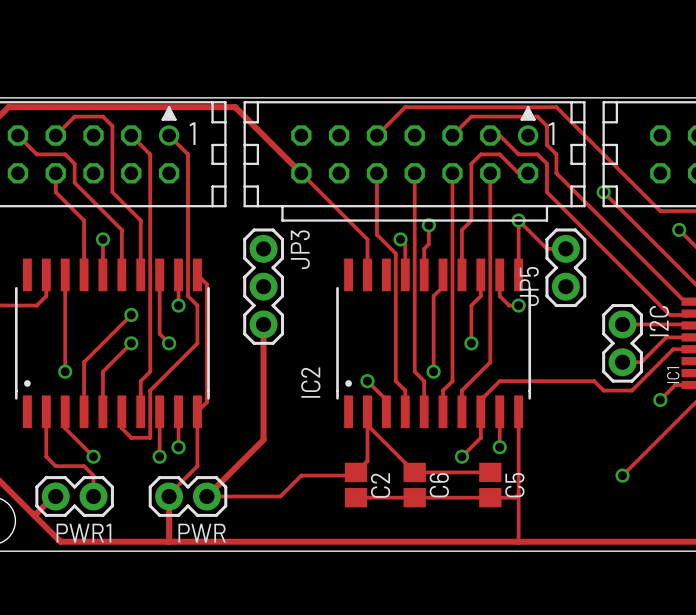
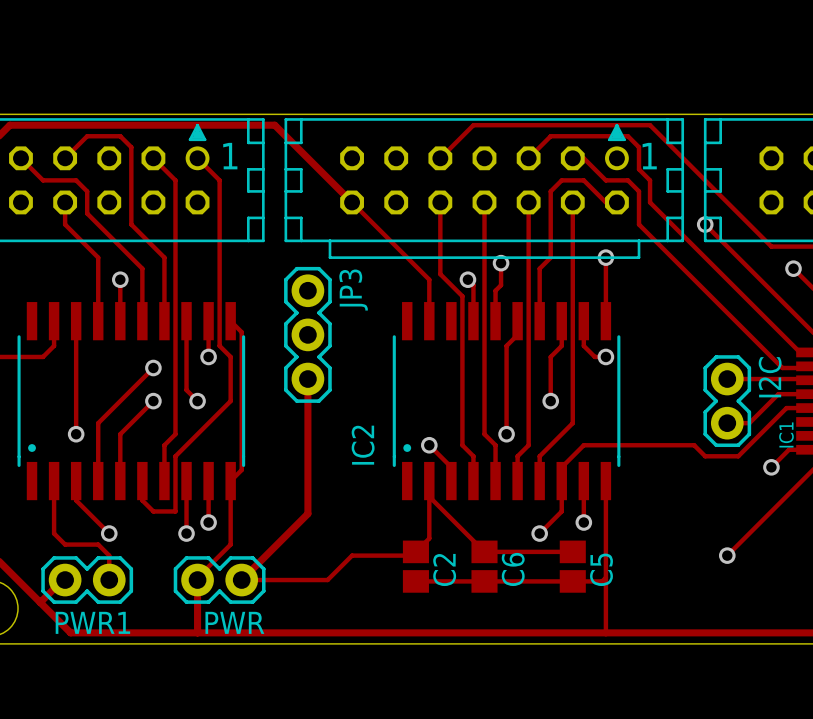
track: (518, 220) (546, 248) (565, 248) -> none
JP5: (565, 267) -> none

